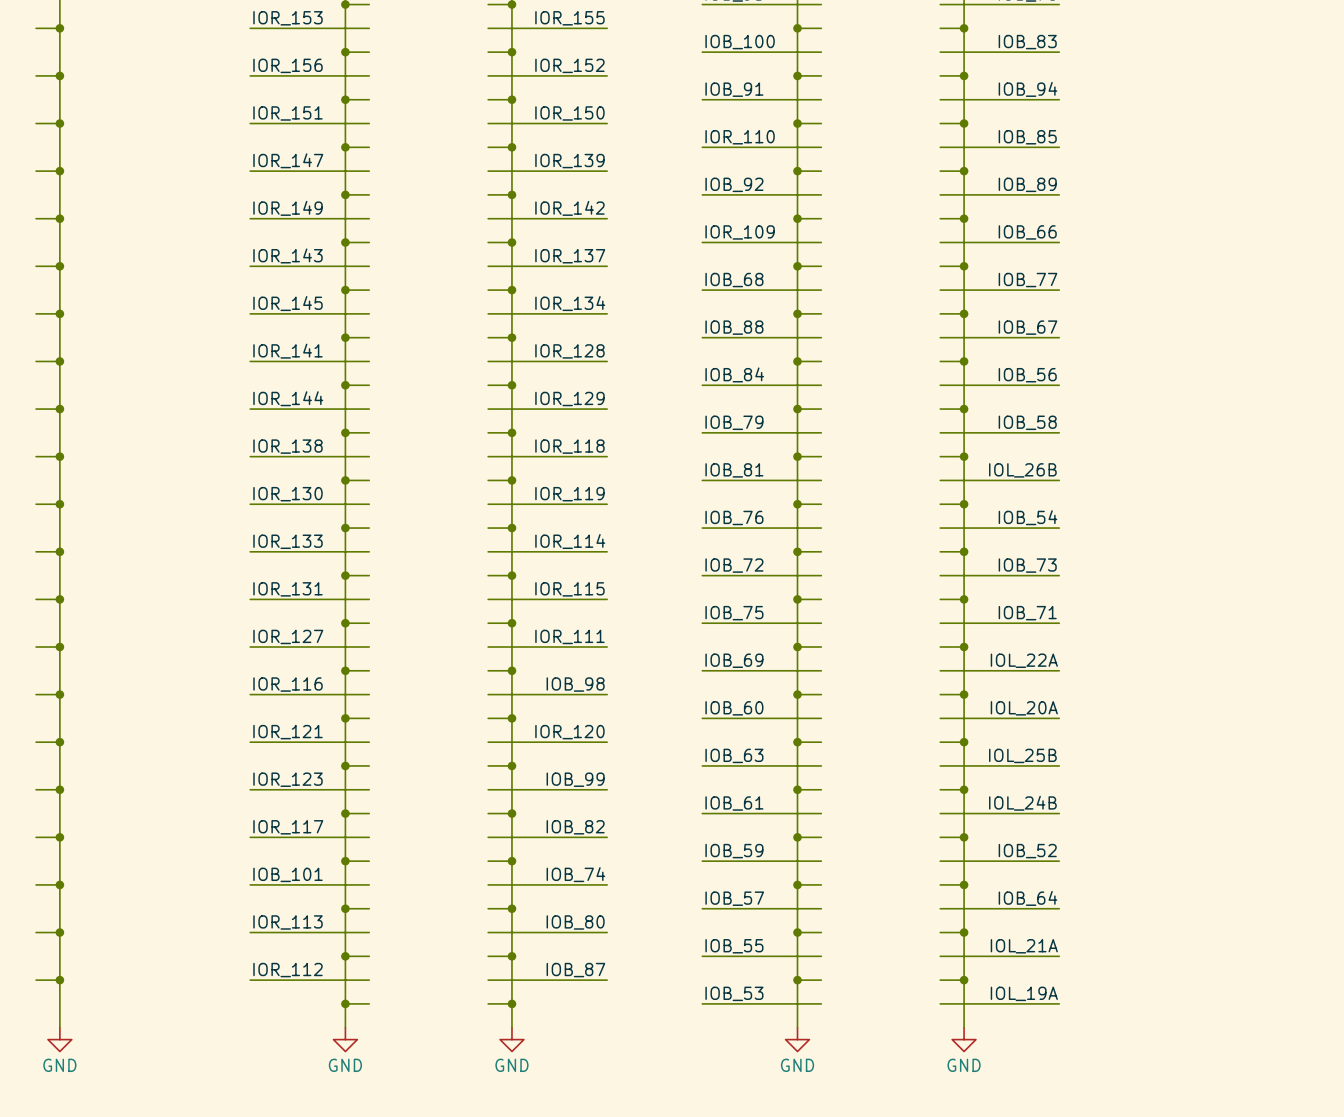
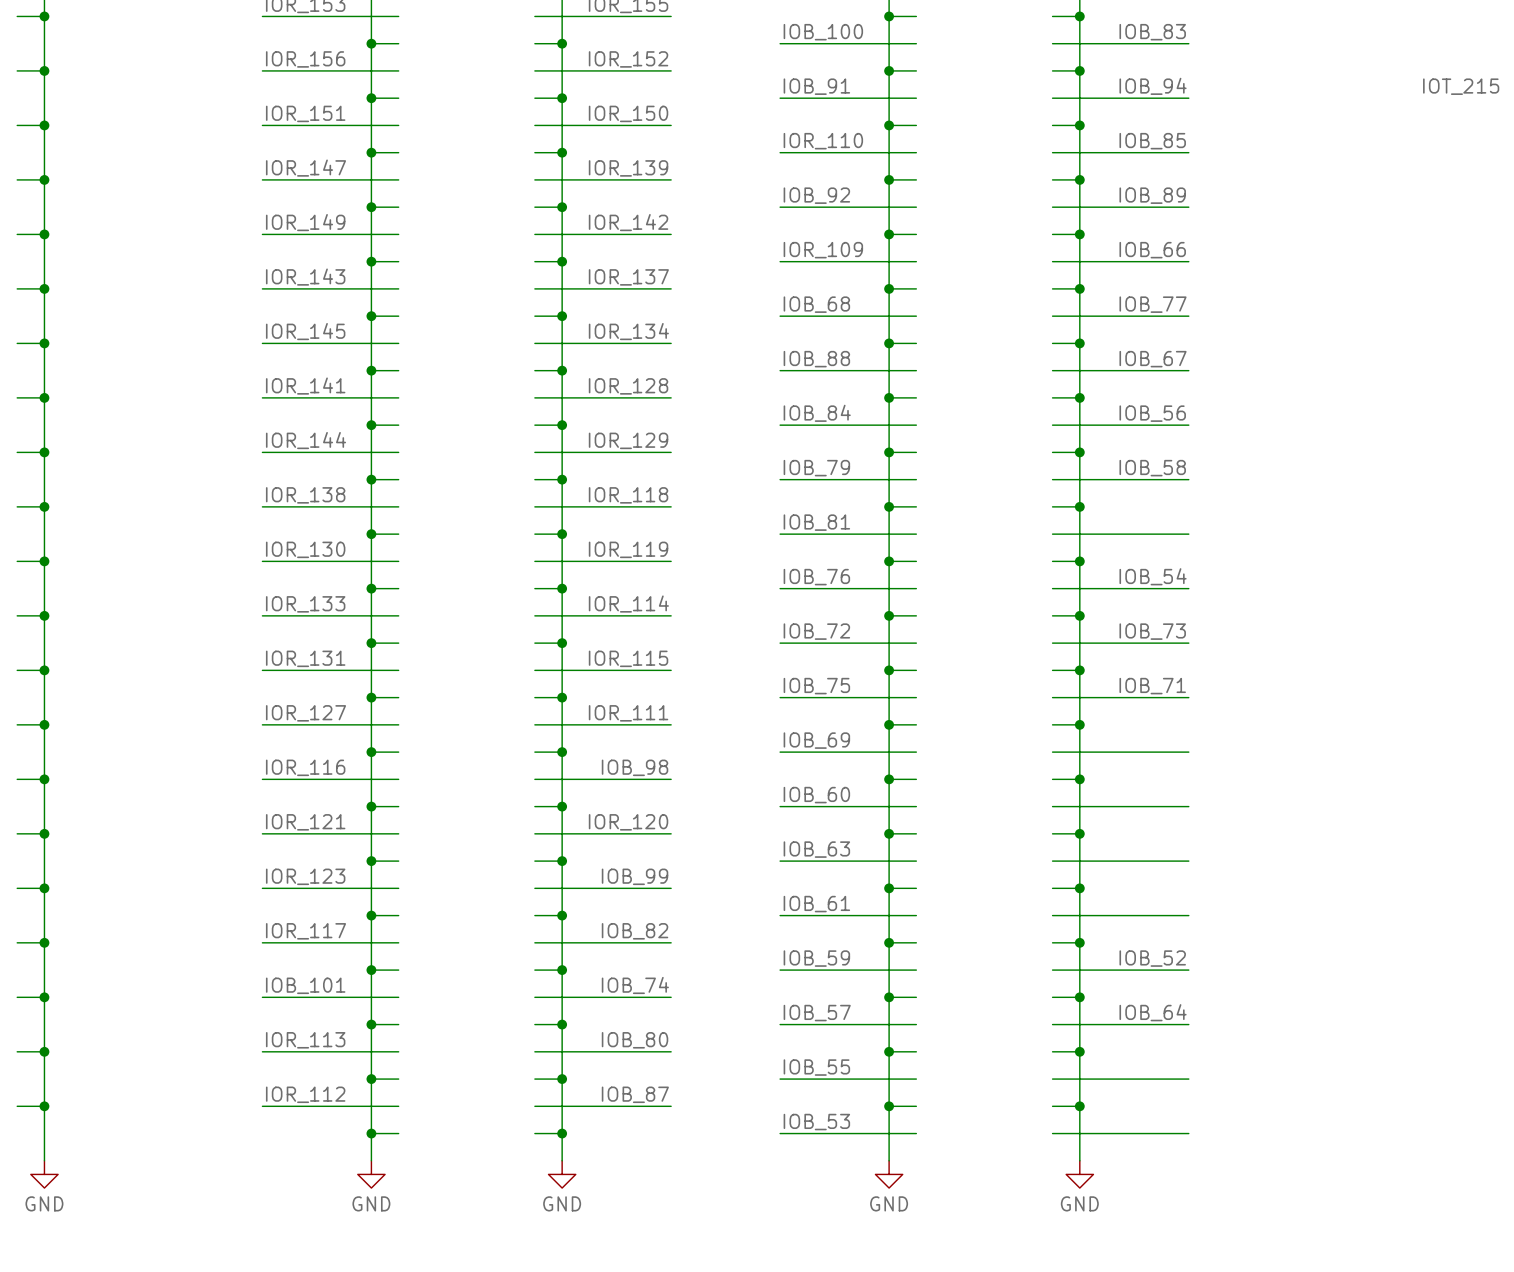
label: none -> IOT_215 (1461, 86)
label: IOL_26B (1022, 470) -> none
label: IOL_22A (1024, 660) -> none
label: IOL_20A (1024, 708) -> none
label: IOL_25B (1022, 755) -> none
label: IOL_24B (1022, 803) -> none
label: IOL_21A (1024, 946) -> none
label: IOL_19A (1024, 993) -> none

